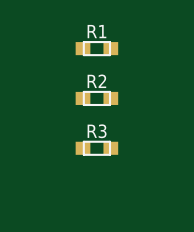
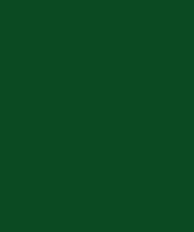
R1: (96, 48) -> none
R2: (96, 98) -> none
R3: (96, 148) -> none

